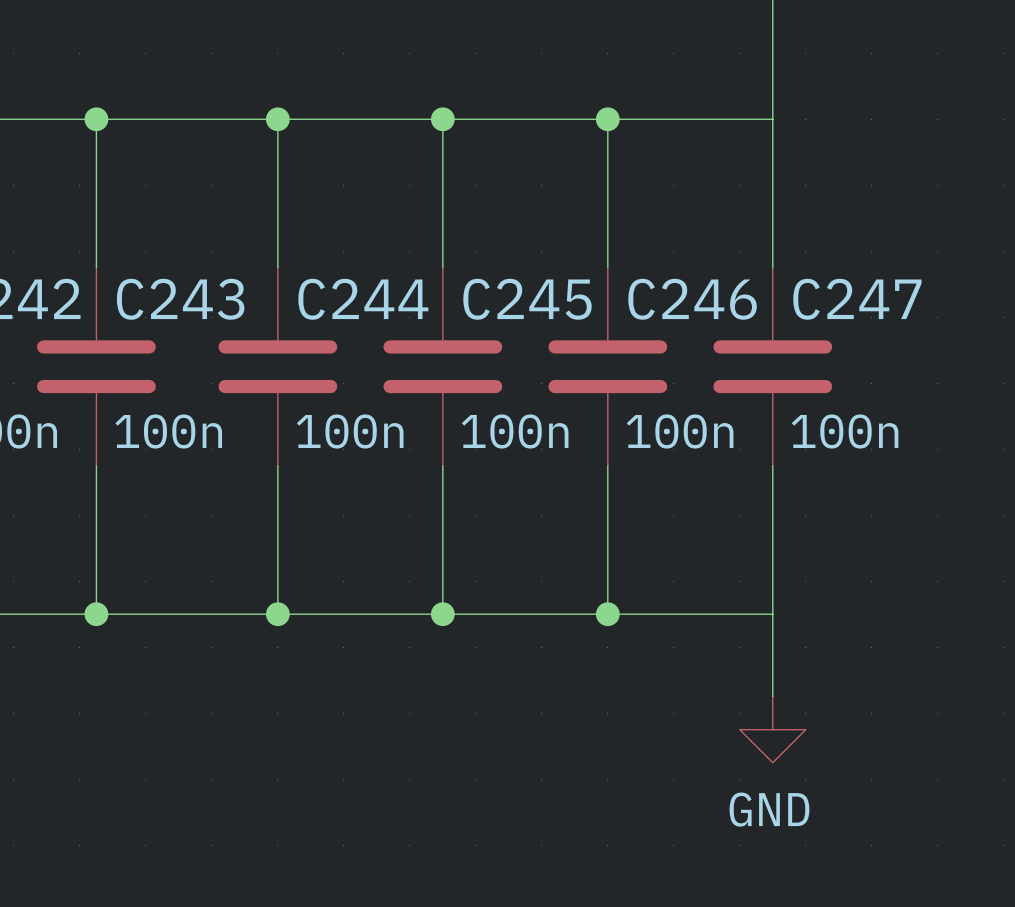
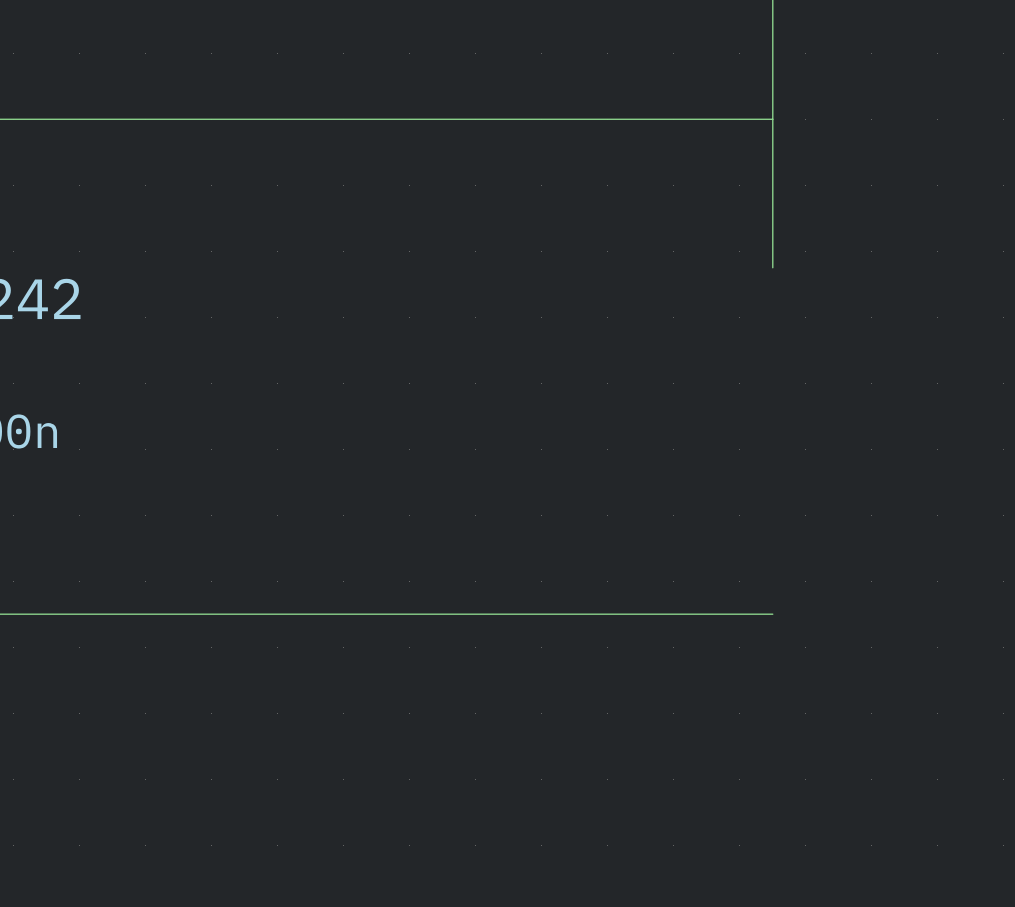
wire: (96, 119) (96, 267) -> none
junction: (96, 119) -> none
wire: (277, 119) (277, 267) -> none
junction: (277, 119) -> none
wire: (442, 119) (442, 267) -> none
junction: (442, 119) -> none
wire: (607, 119) (607, 267) -> none
junction: (607, 119) -> none
C243: (96, 366) -> none
C244: (277, 366) -> none
C245: (442, 366) -> none
C246: (607, 366) -> none
C247: (772, 366) -> none
wire: (96, 465) (96, 614) -> none
wire: (277, 465) (277, 614) -> none
wire: (442, 465) (442, 614) -> none
wire: (607, 465) (607, 614) -> none
wire: (772, 465) (772, 696) -> none
junction: (96, 614) -> none
junction: (277, 614) -> none
junction: (442, 614) -> none
junction: (607, 614) -> none
power symbol: GND (772, 729) -> none

